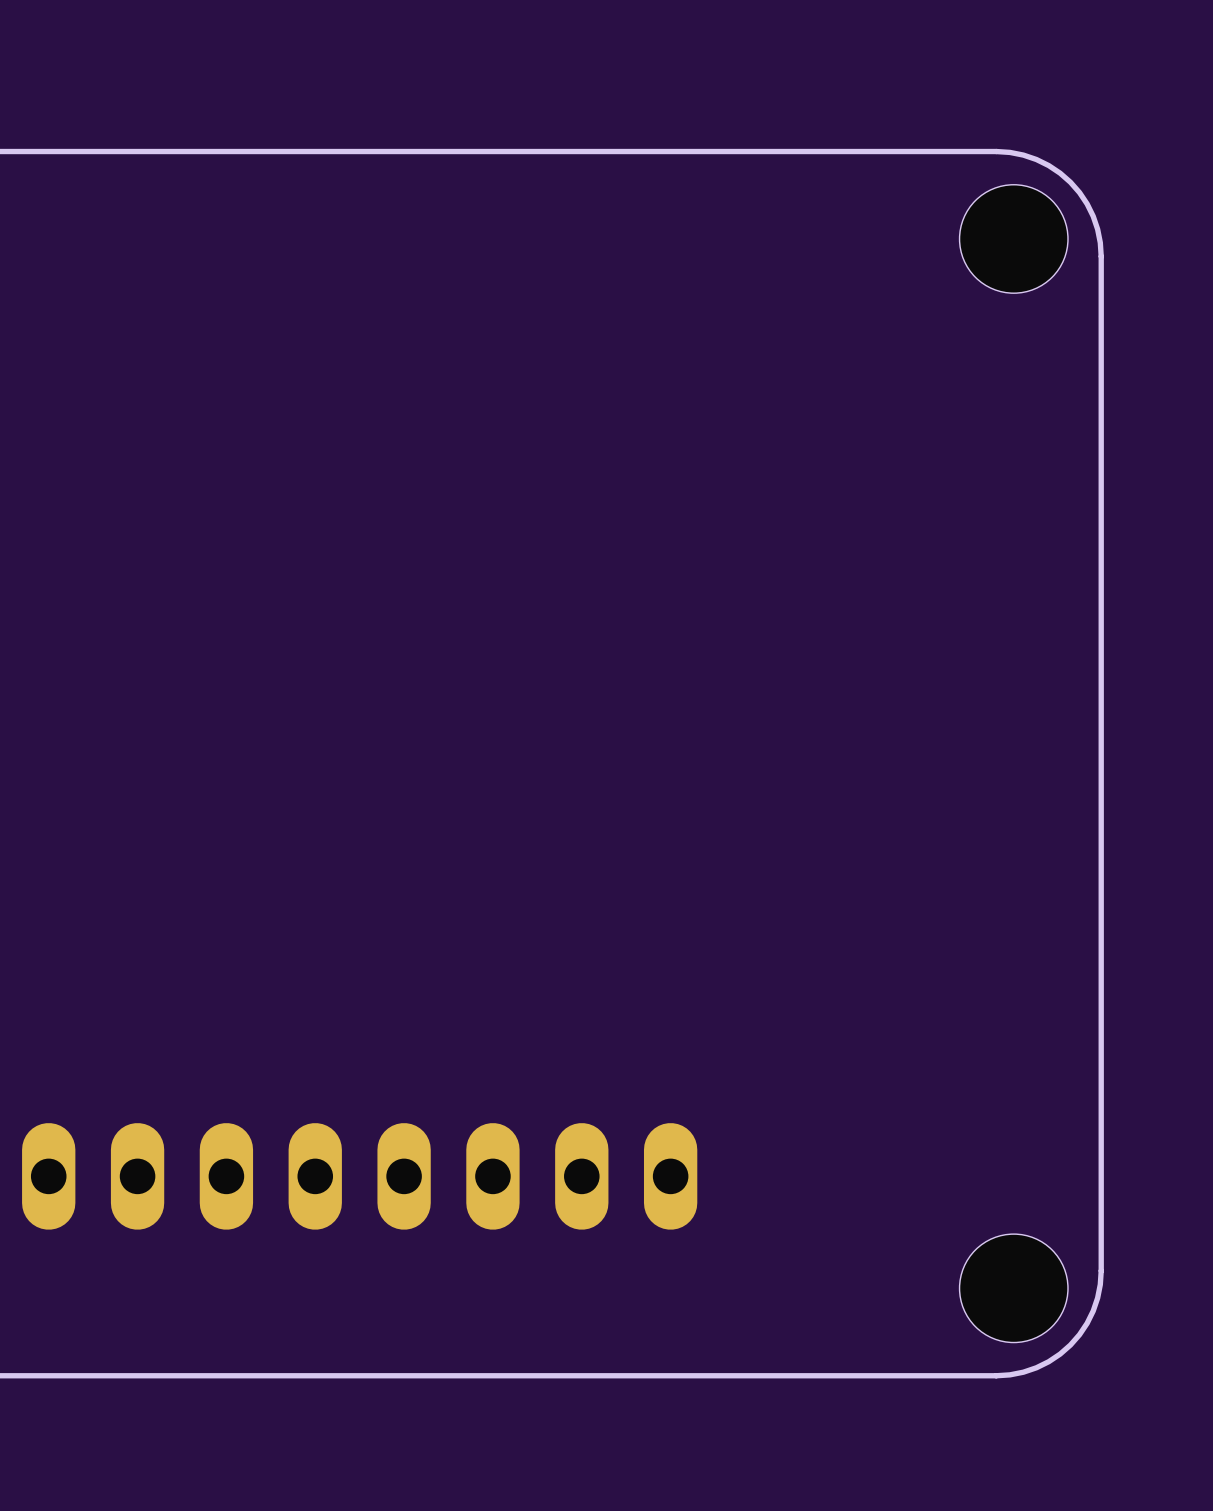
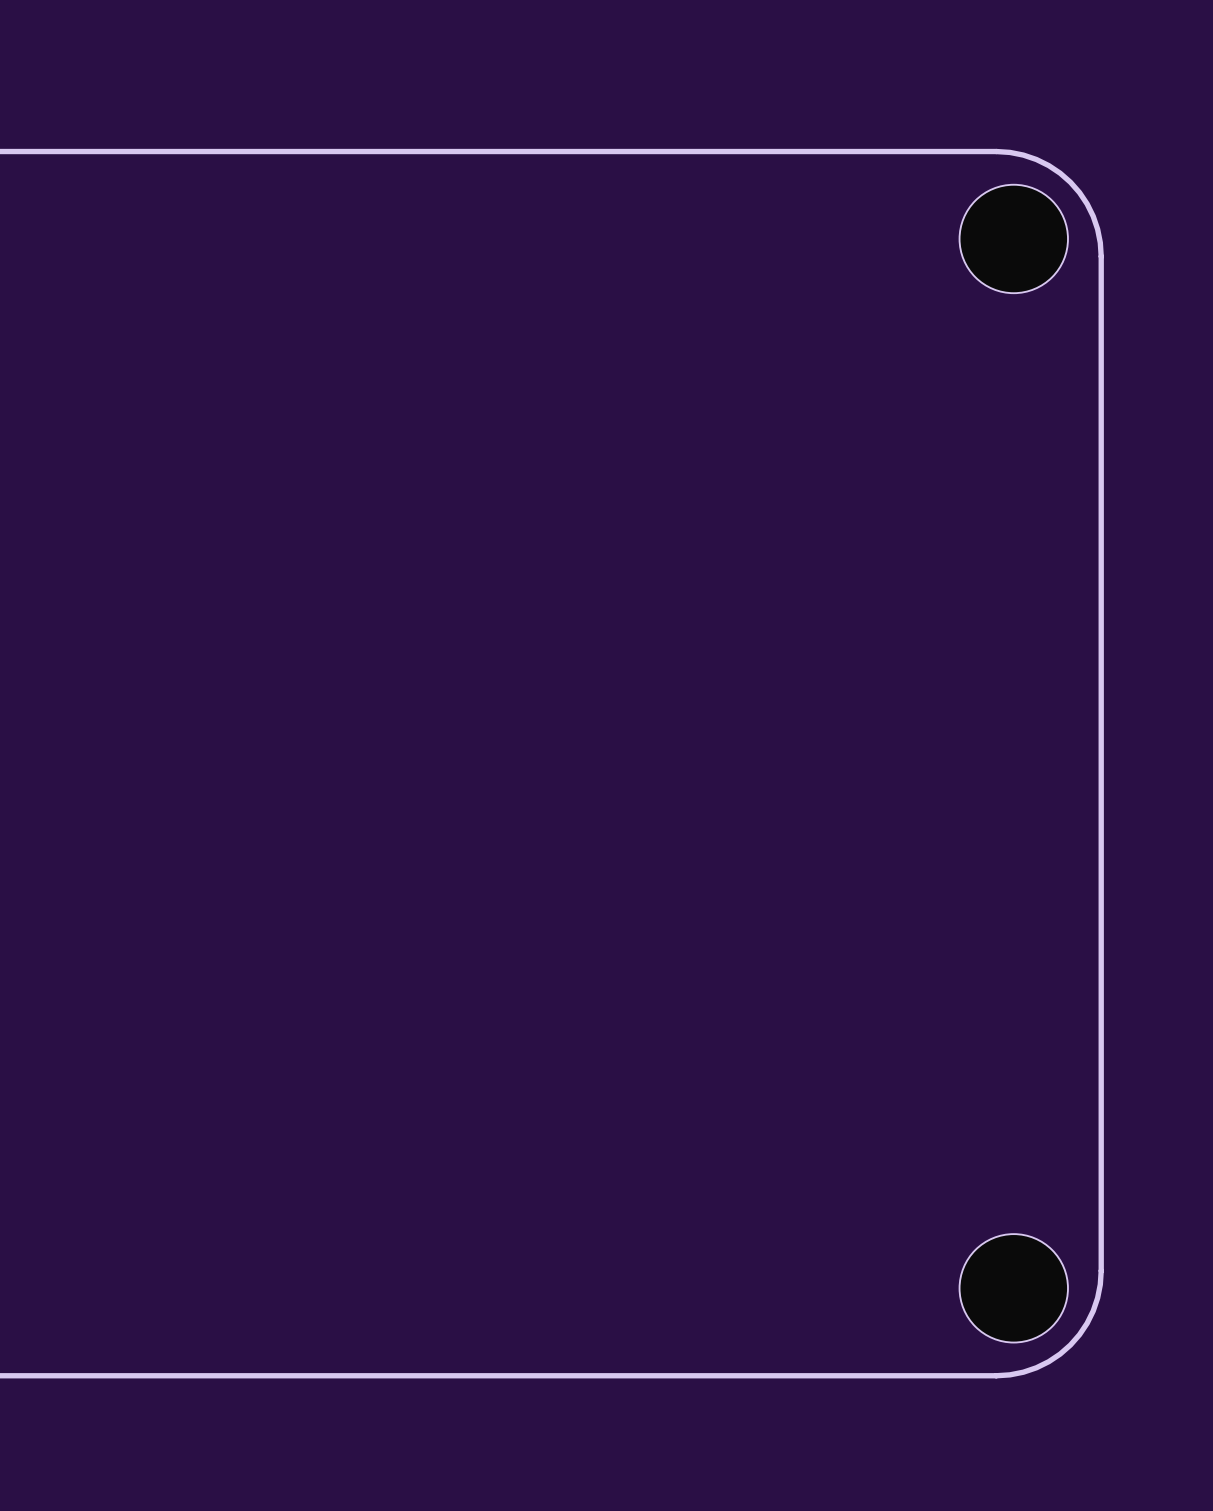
part: (359, 1176) -> none

